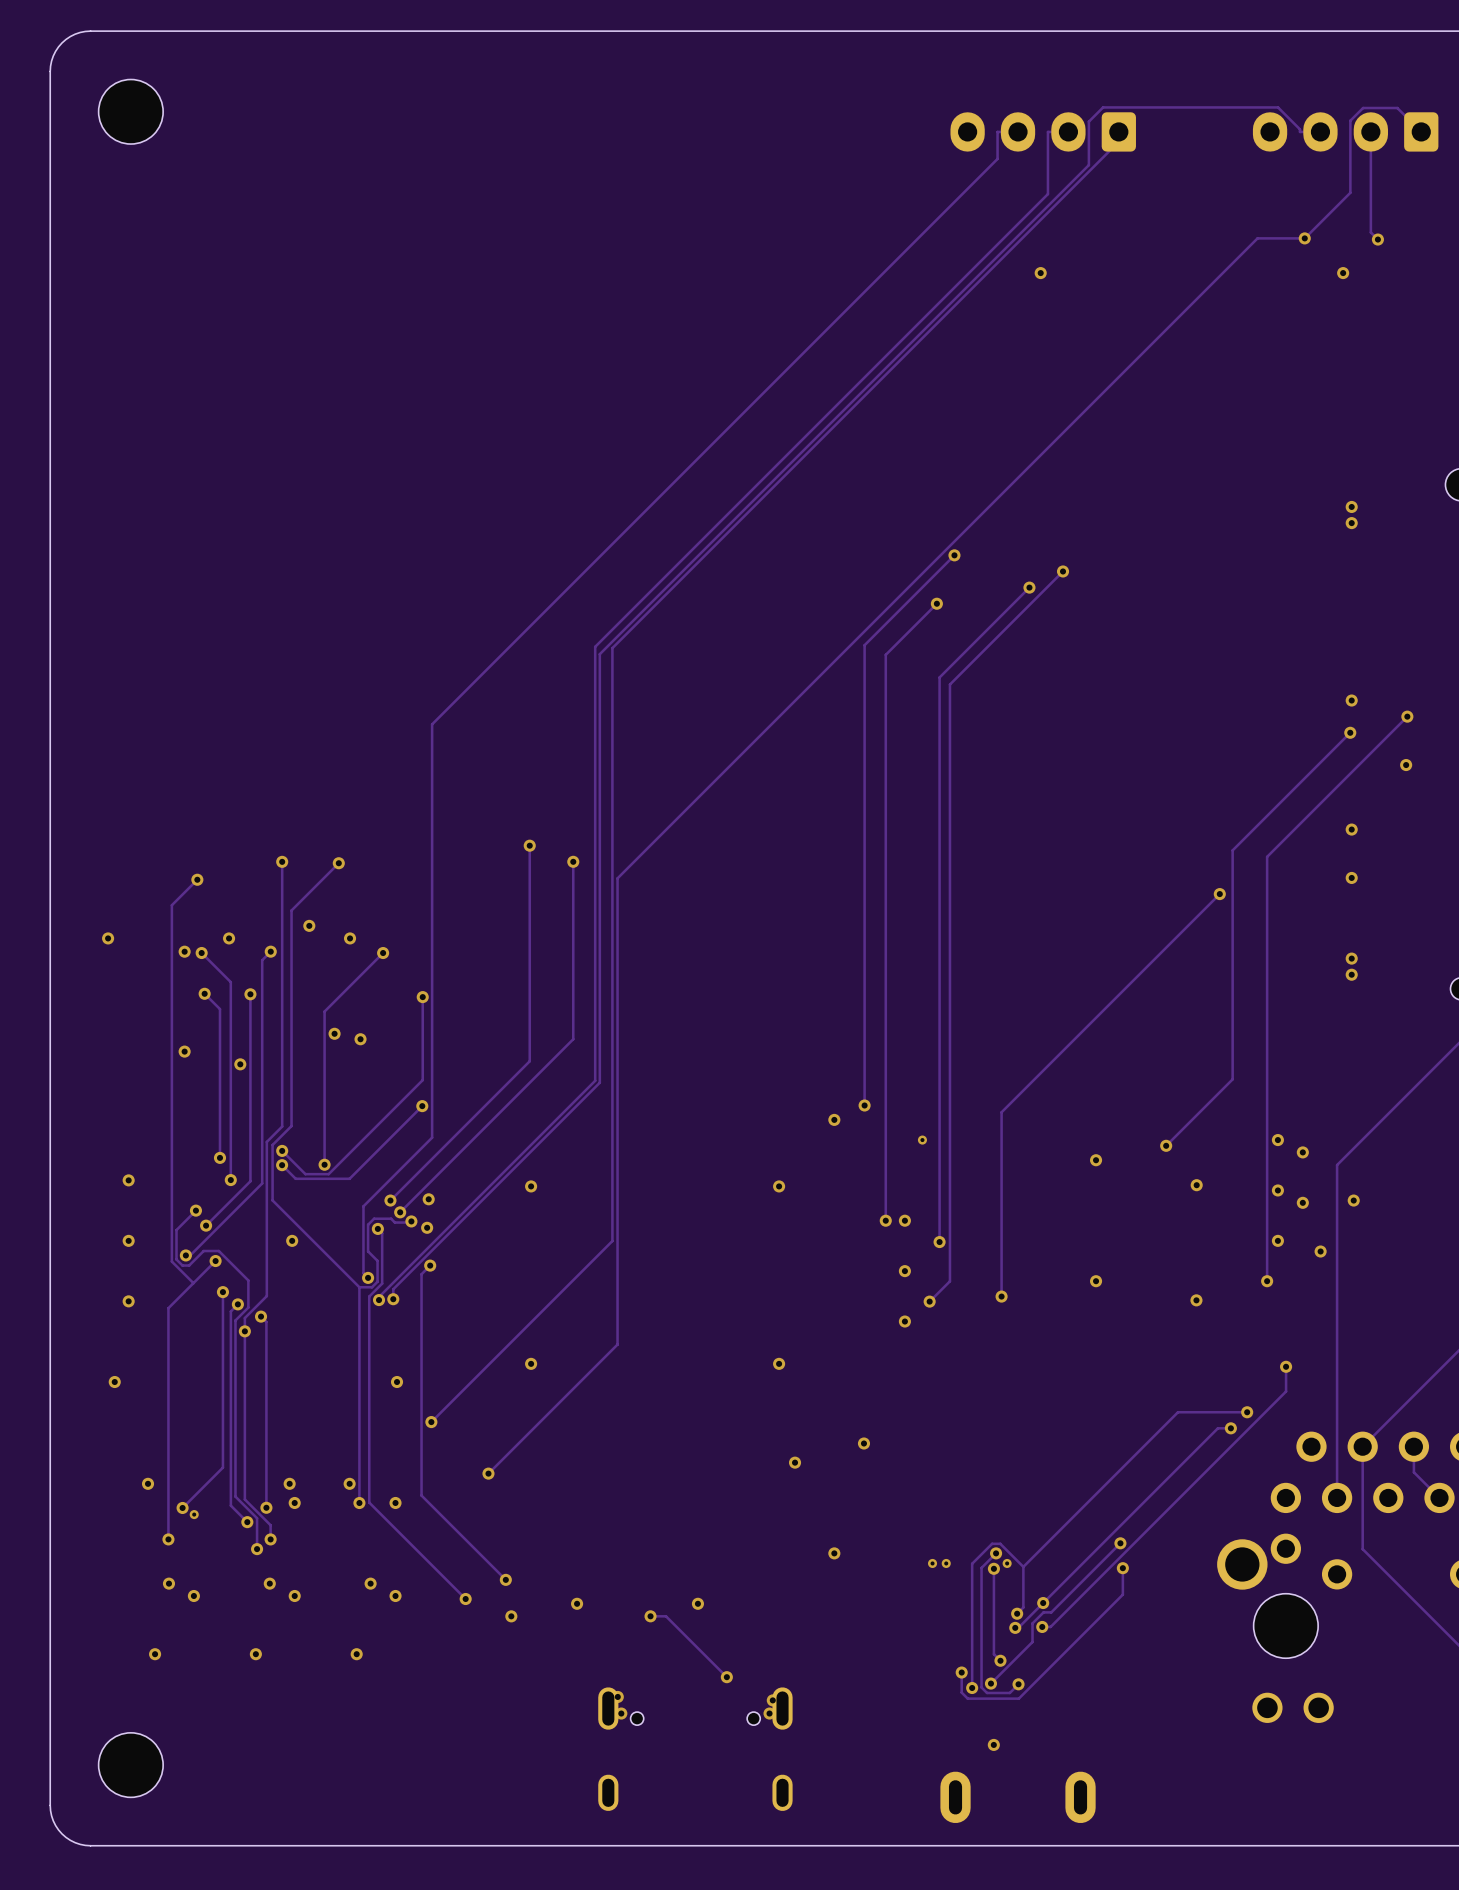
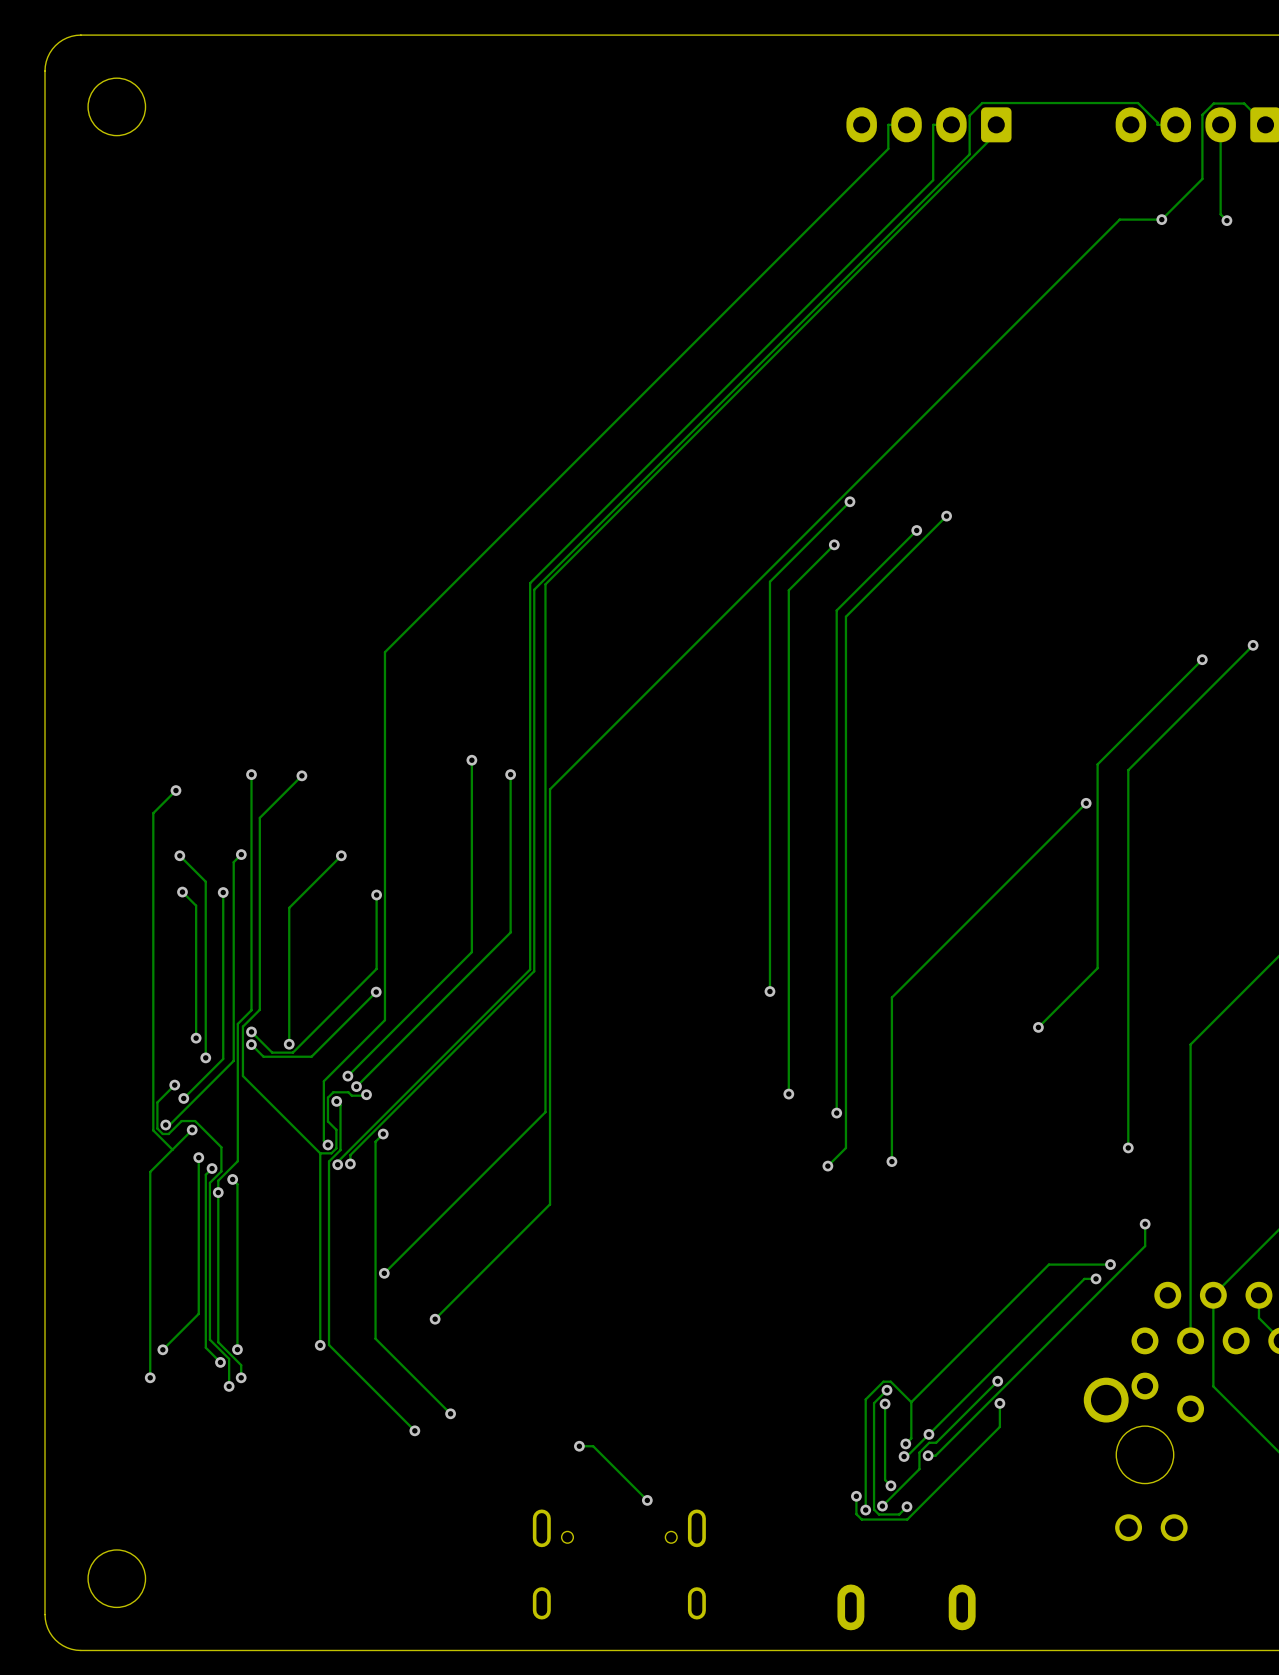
via: (1040, 273) -> none
via: (1343, 273) -> none
via: (1351, 506) -> none
via: (1351, 523) -> none
via: (1351, 700) -> none
via: (1406, 765) -> none
via: (1351, 829) -> none
via: (1351, 877) -> none
via: (309, 925) -> none
via: (108, 938) -> none
via: (229, 938) -> none
via: (350, 938) -> none
via: (184, 951) -> none
via: (1351, 958) -> none
via: (1351, 974) -> none
via: (334, 1033) -> none
via: (360, 1039) -> none
via: (184, 1051) -> none
via: (240, 1064) -> none
via: (834, 1119) -> none
via: (922, 1140) -> none
via: (1277, 1140) -> none
via: (1302, 1152) -> none
via: (1096, 1160) -> none
via: (128, 1180) -> none
via: (1196, 1185) -> none
via: (531, 1186) -> none
via: (779, 1186) -> none
via: (1277, 1190) -> none
via: (428, 1199) -> none
via: (1353, 1200) -> none
via: (1302, 1202) -> none
via: (904, 1220) -> none
via: (427, 1227) -> none
via: (128, 1240) -> none
via: (292, 1240) -> none
via: (1277, 1240) -> none
via: (1320, 1251) -> none
via: (904, 1271) -> none
via: (1096, 1281) -> none
via: (1196, 1300) -> none
via: (128, 1301) -> none
via: (904, 1321) -> none
via: (531, 1363) -> none
via: (779, 1363) -> none
via: (114, 1382) -> none
via: (397, 1382) -> none
via: (863, 1443) -> none
via: (795, 1462) -> none
via: (148, 1483) -> none
via: (289, 1483) -> none
via: (349, 1483) -> none
via: (294, 1502) -> none
via: (395, 1502) -> none
via: (194, 1514) -> none
via: (834, 1553) -> none
via: (932, 1563) -> none
via: (946, 1563) -> none
via: (1007, 1563) -> none
via: (168, 1583) -> none
via: (269, 1583) -> none
via: (370, 1583) -> none
via: (193, 1595) -> none
via: (294, 1595) -> none
via: (395, 1595) -> none
via: (577, 1603) -> none
via: (697, 1603) -> none
via: (511, 1616) -> none
via: (155, 1654) -> none
via: (255, 1654) -> none
via: (356, 1654) -> none
via: (617, 1696) -> none
via: (772, 1700) -> none
via: (621, 1713) -> none
via: (769, 1713) -> none
via: (993, 1744) -> none

